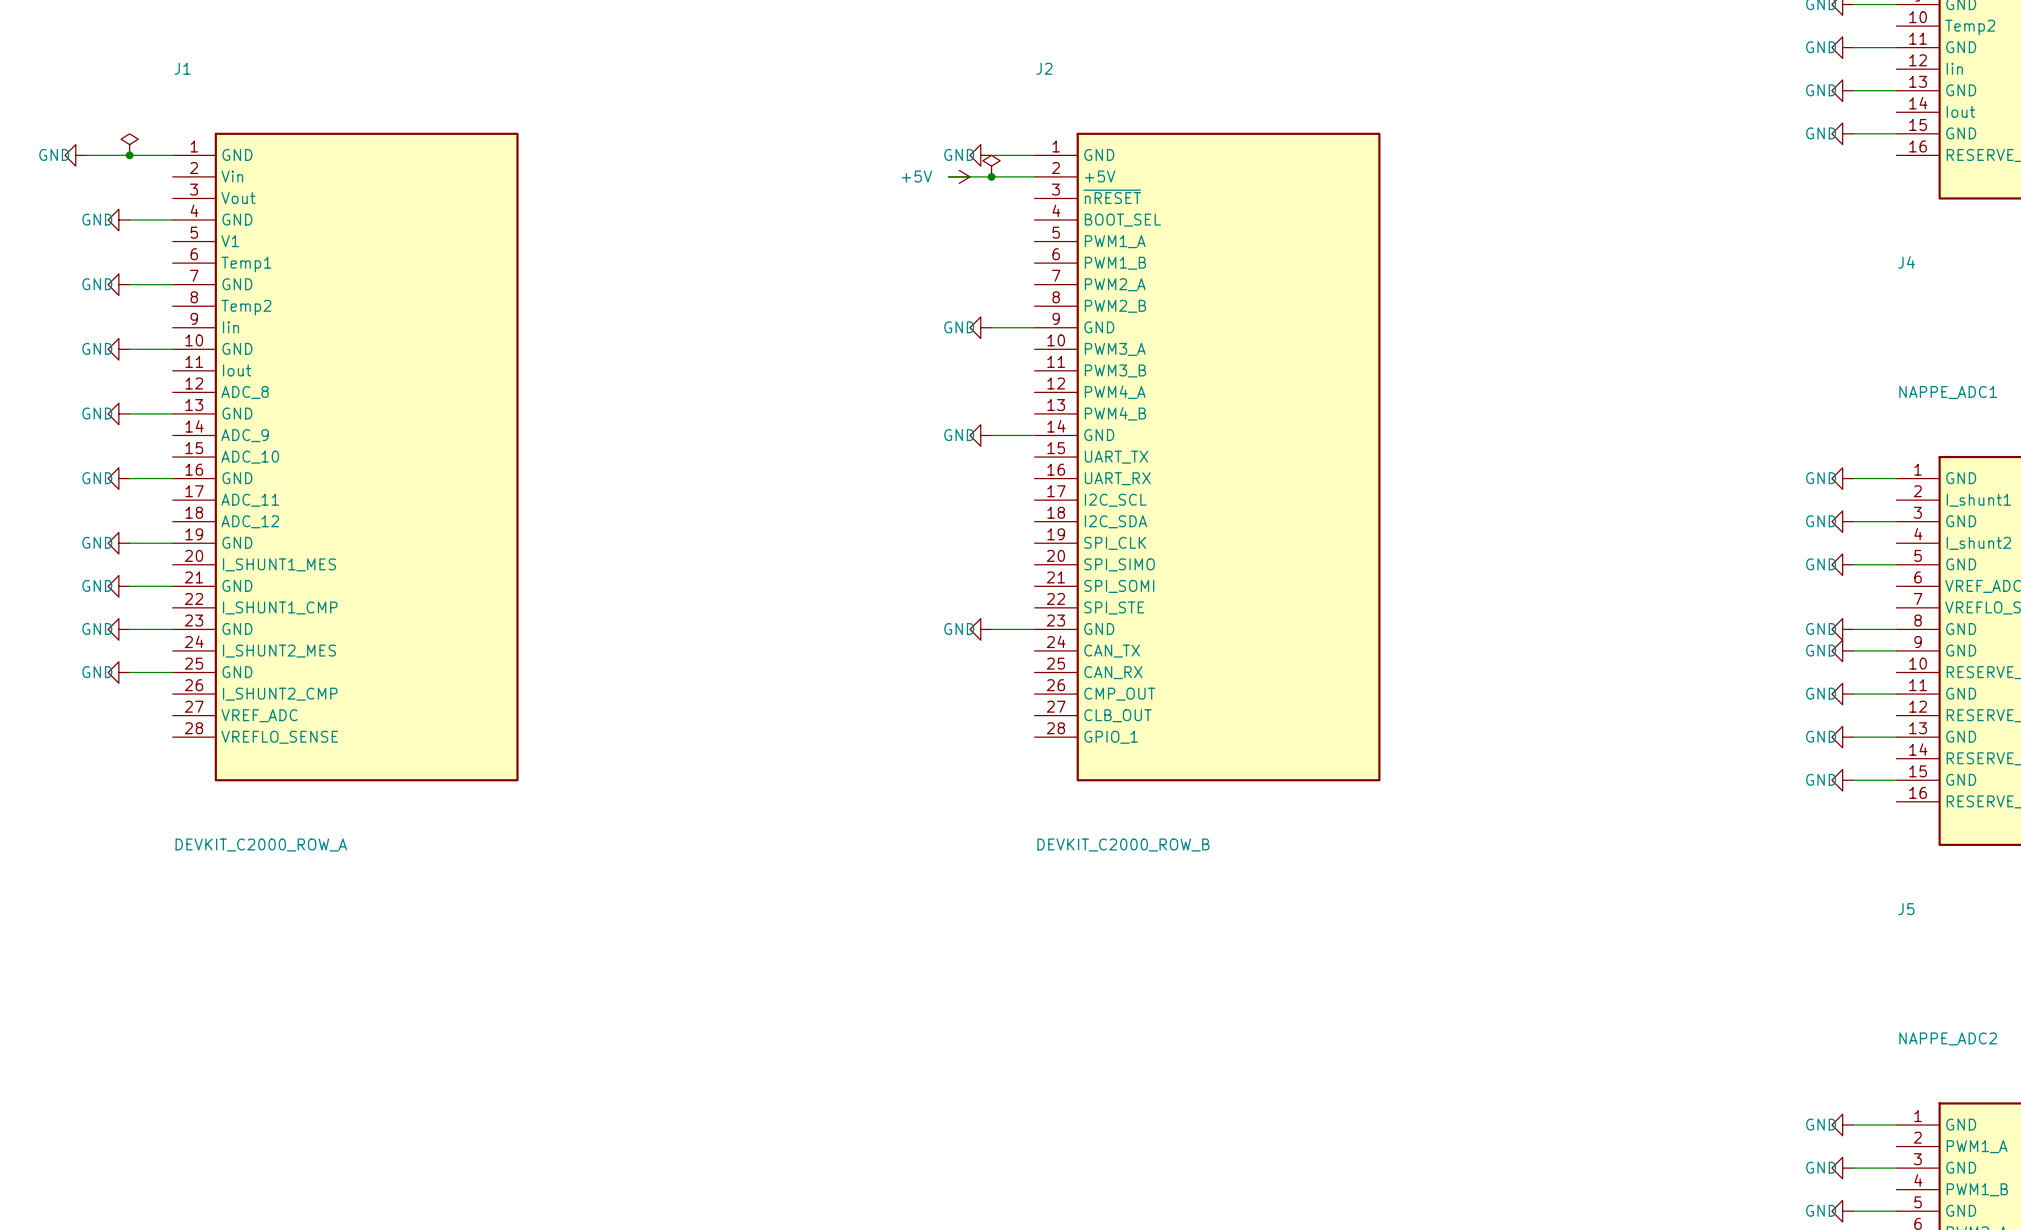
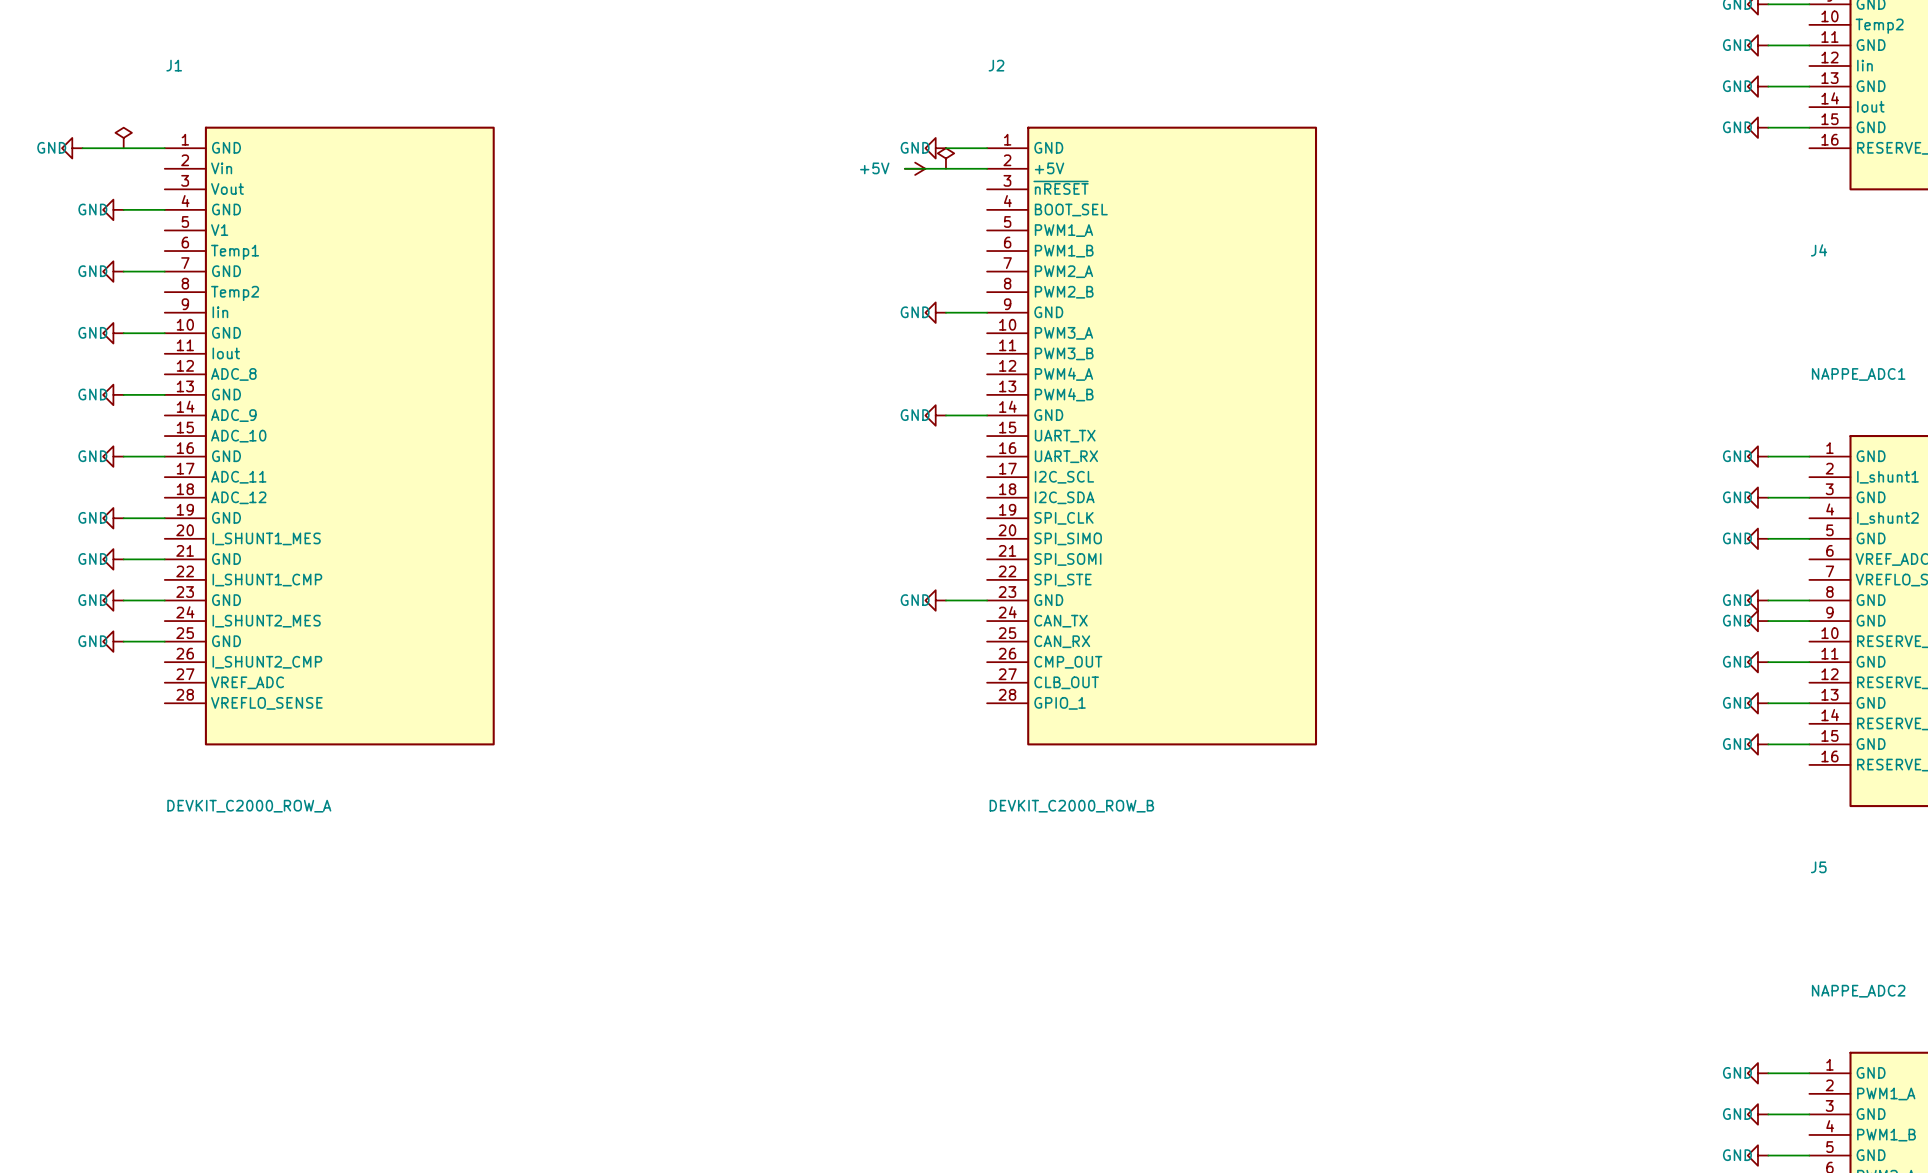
junction: (129, 155) -> none
junction: (991, 176) -> none

